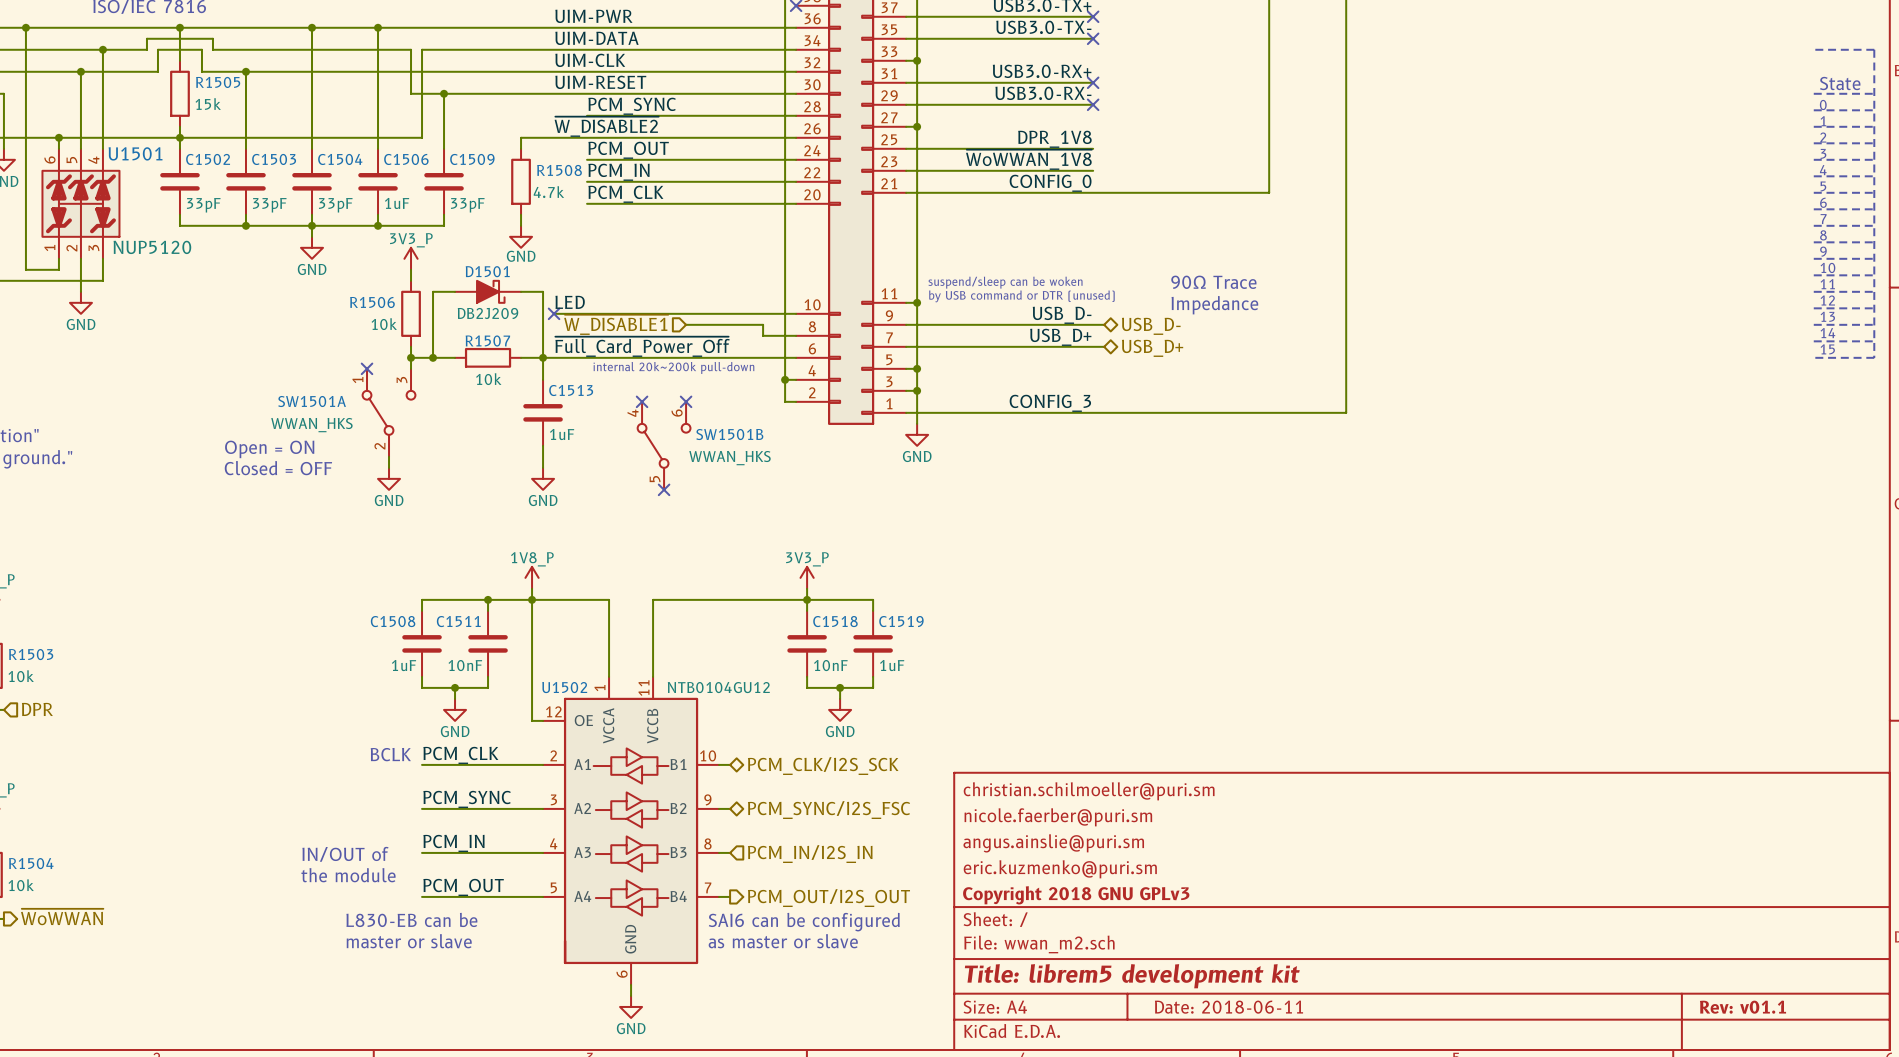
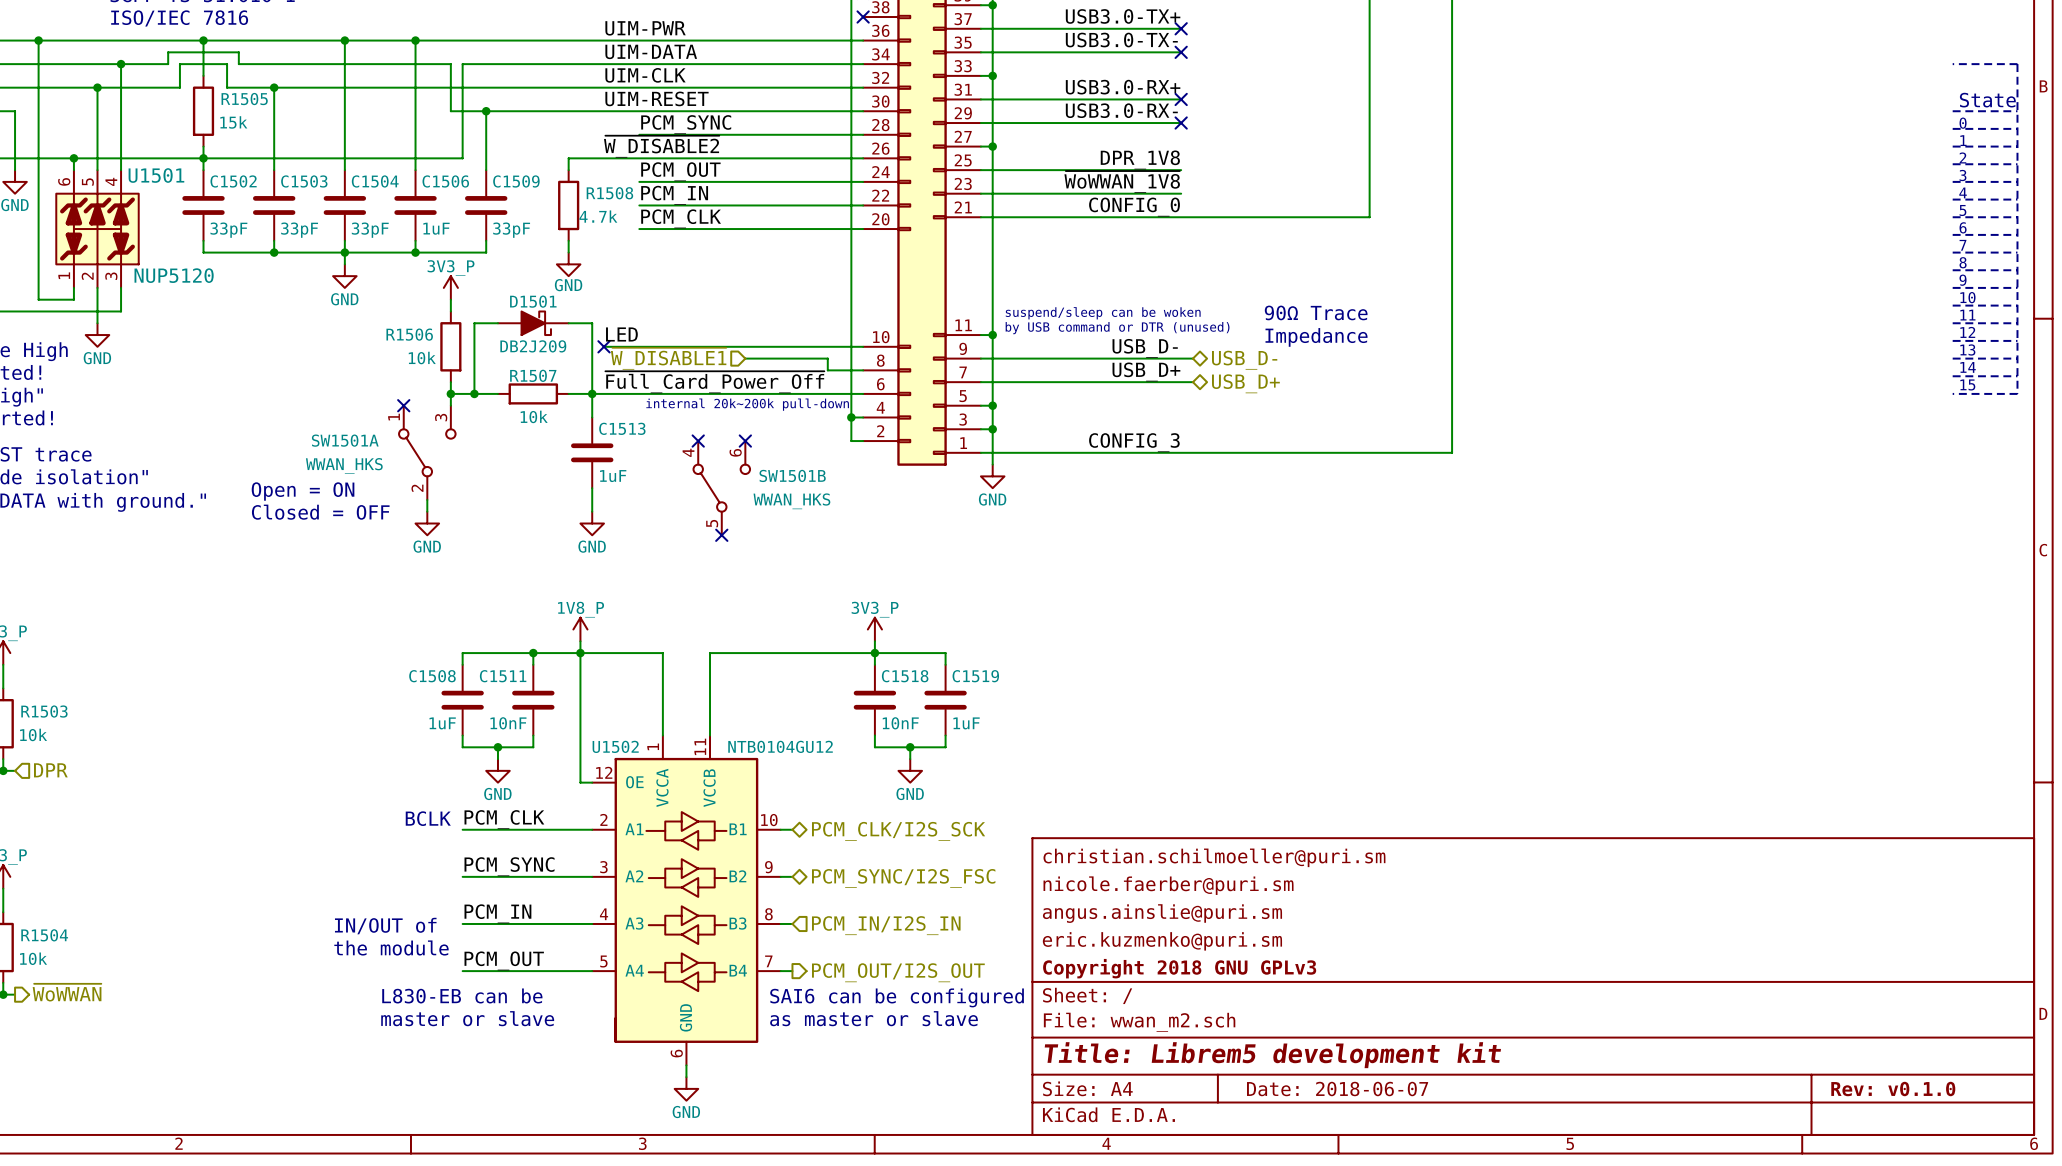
title block: Title: librem5 development kit (1132, 976) -> Title: Librem5 development kit (1272, 1055)
title block: Date: 2018-06-11 (1228, 1007) -> Date: 2018-06-07 (1337, 1089)
title block: Rev: v01.1 (1743, 1007) -> Rev: v0.1.0 (1893, 1089)

